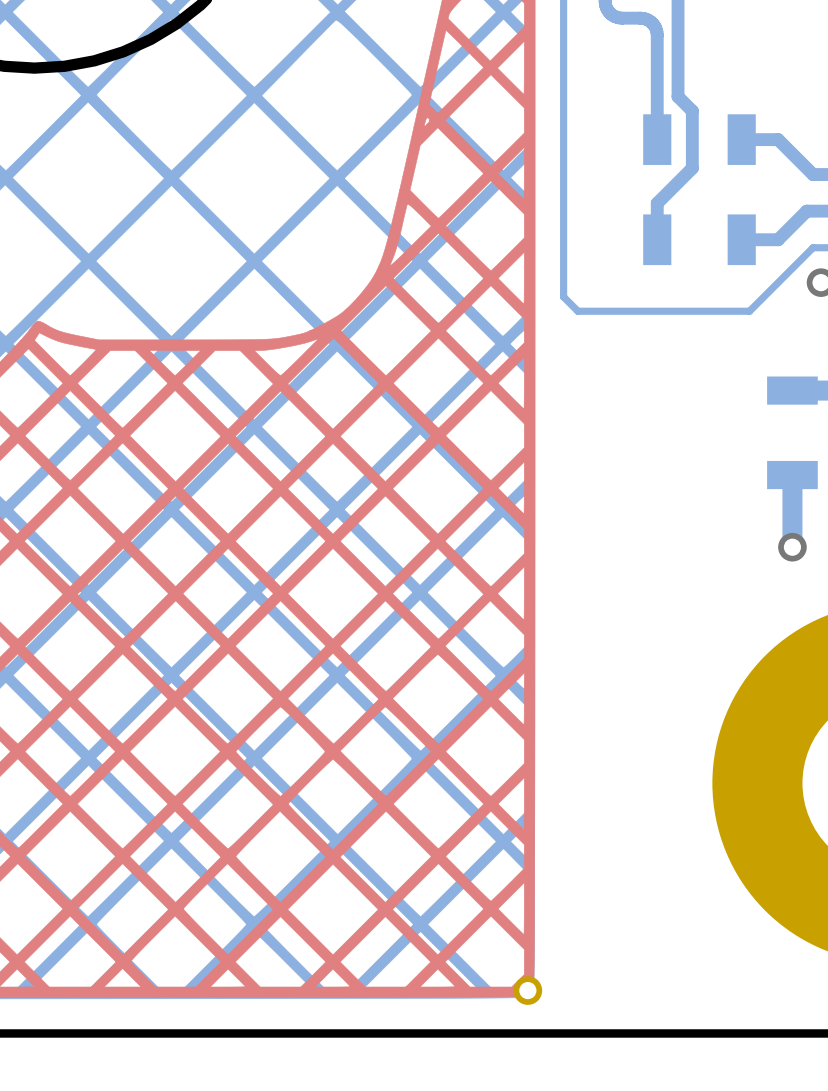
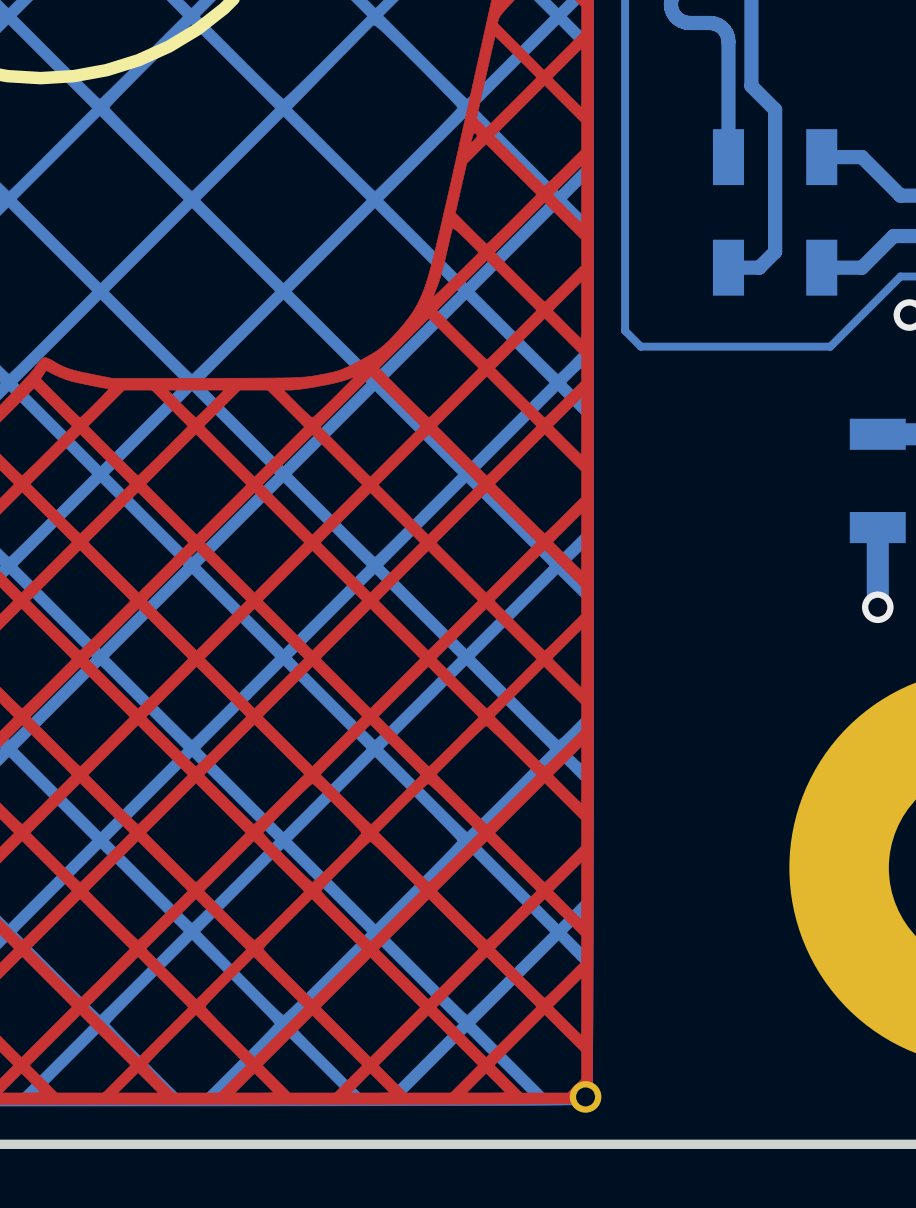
bottom track: (678, 75) (678, 96) (692, 111) (692, 168) (657, 203) (657, 239) -> (751, 86) (775, 109) (775, 251) (759, 267) (728, 267)

